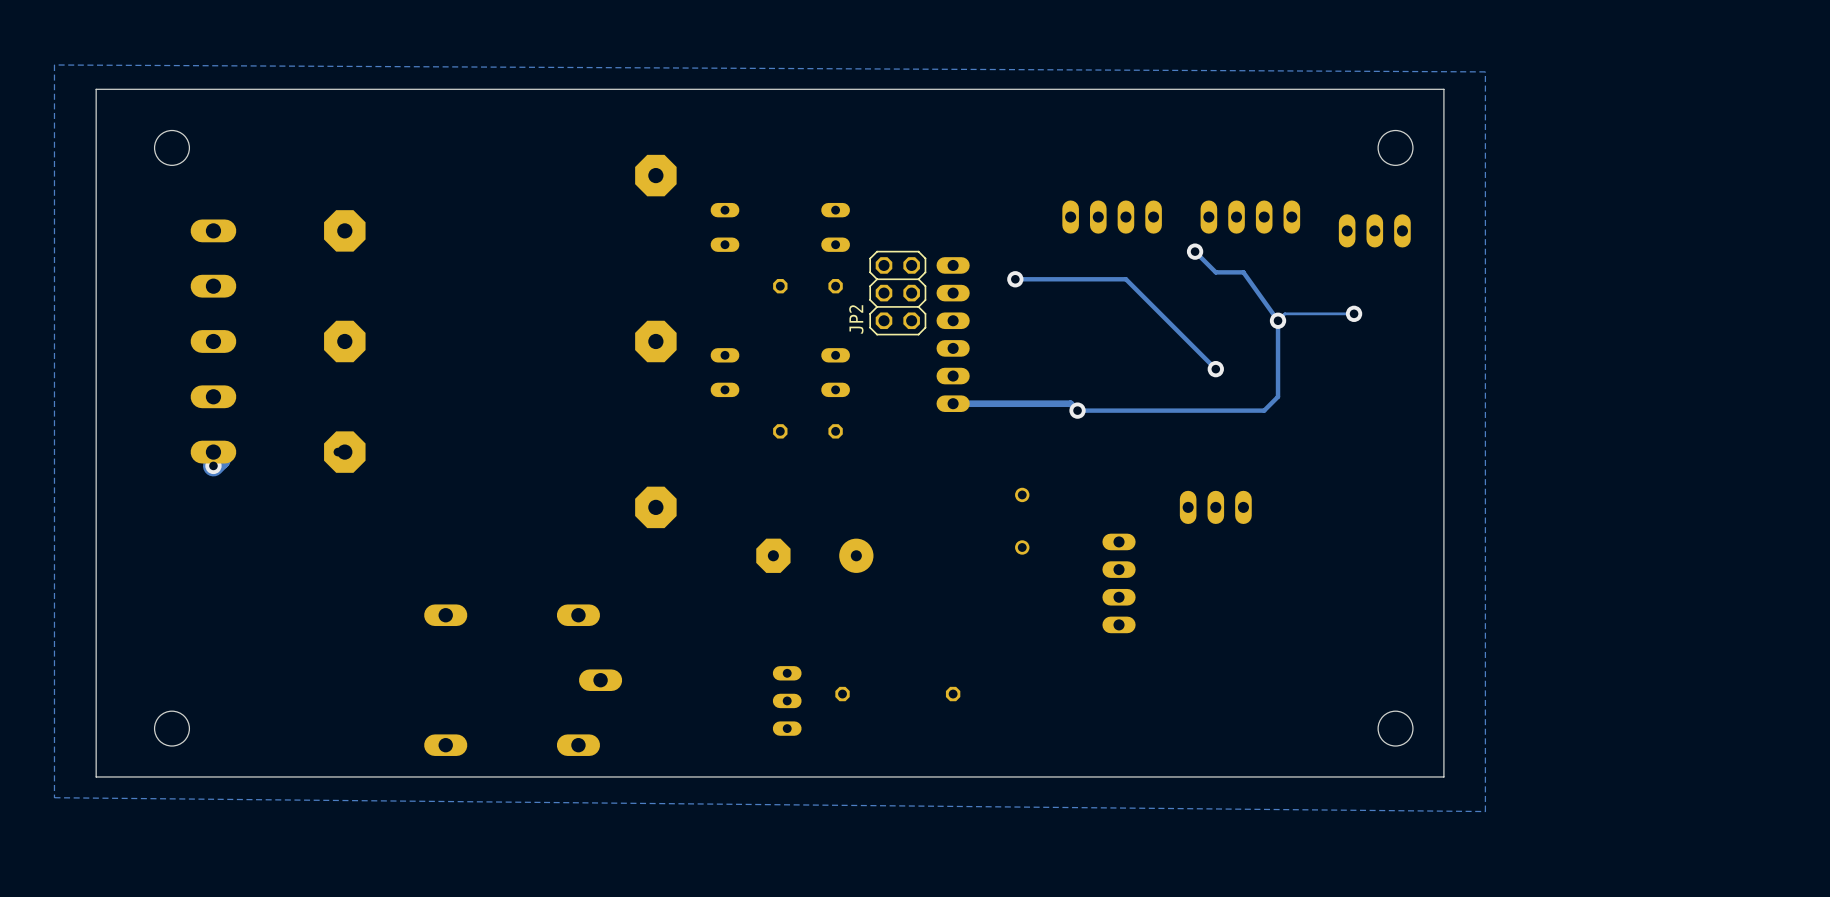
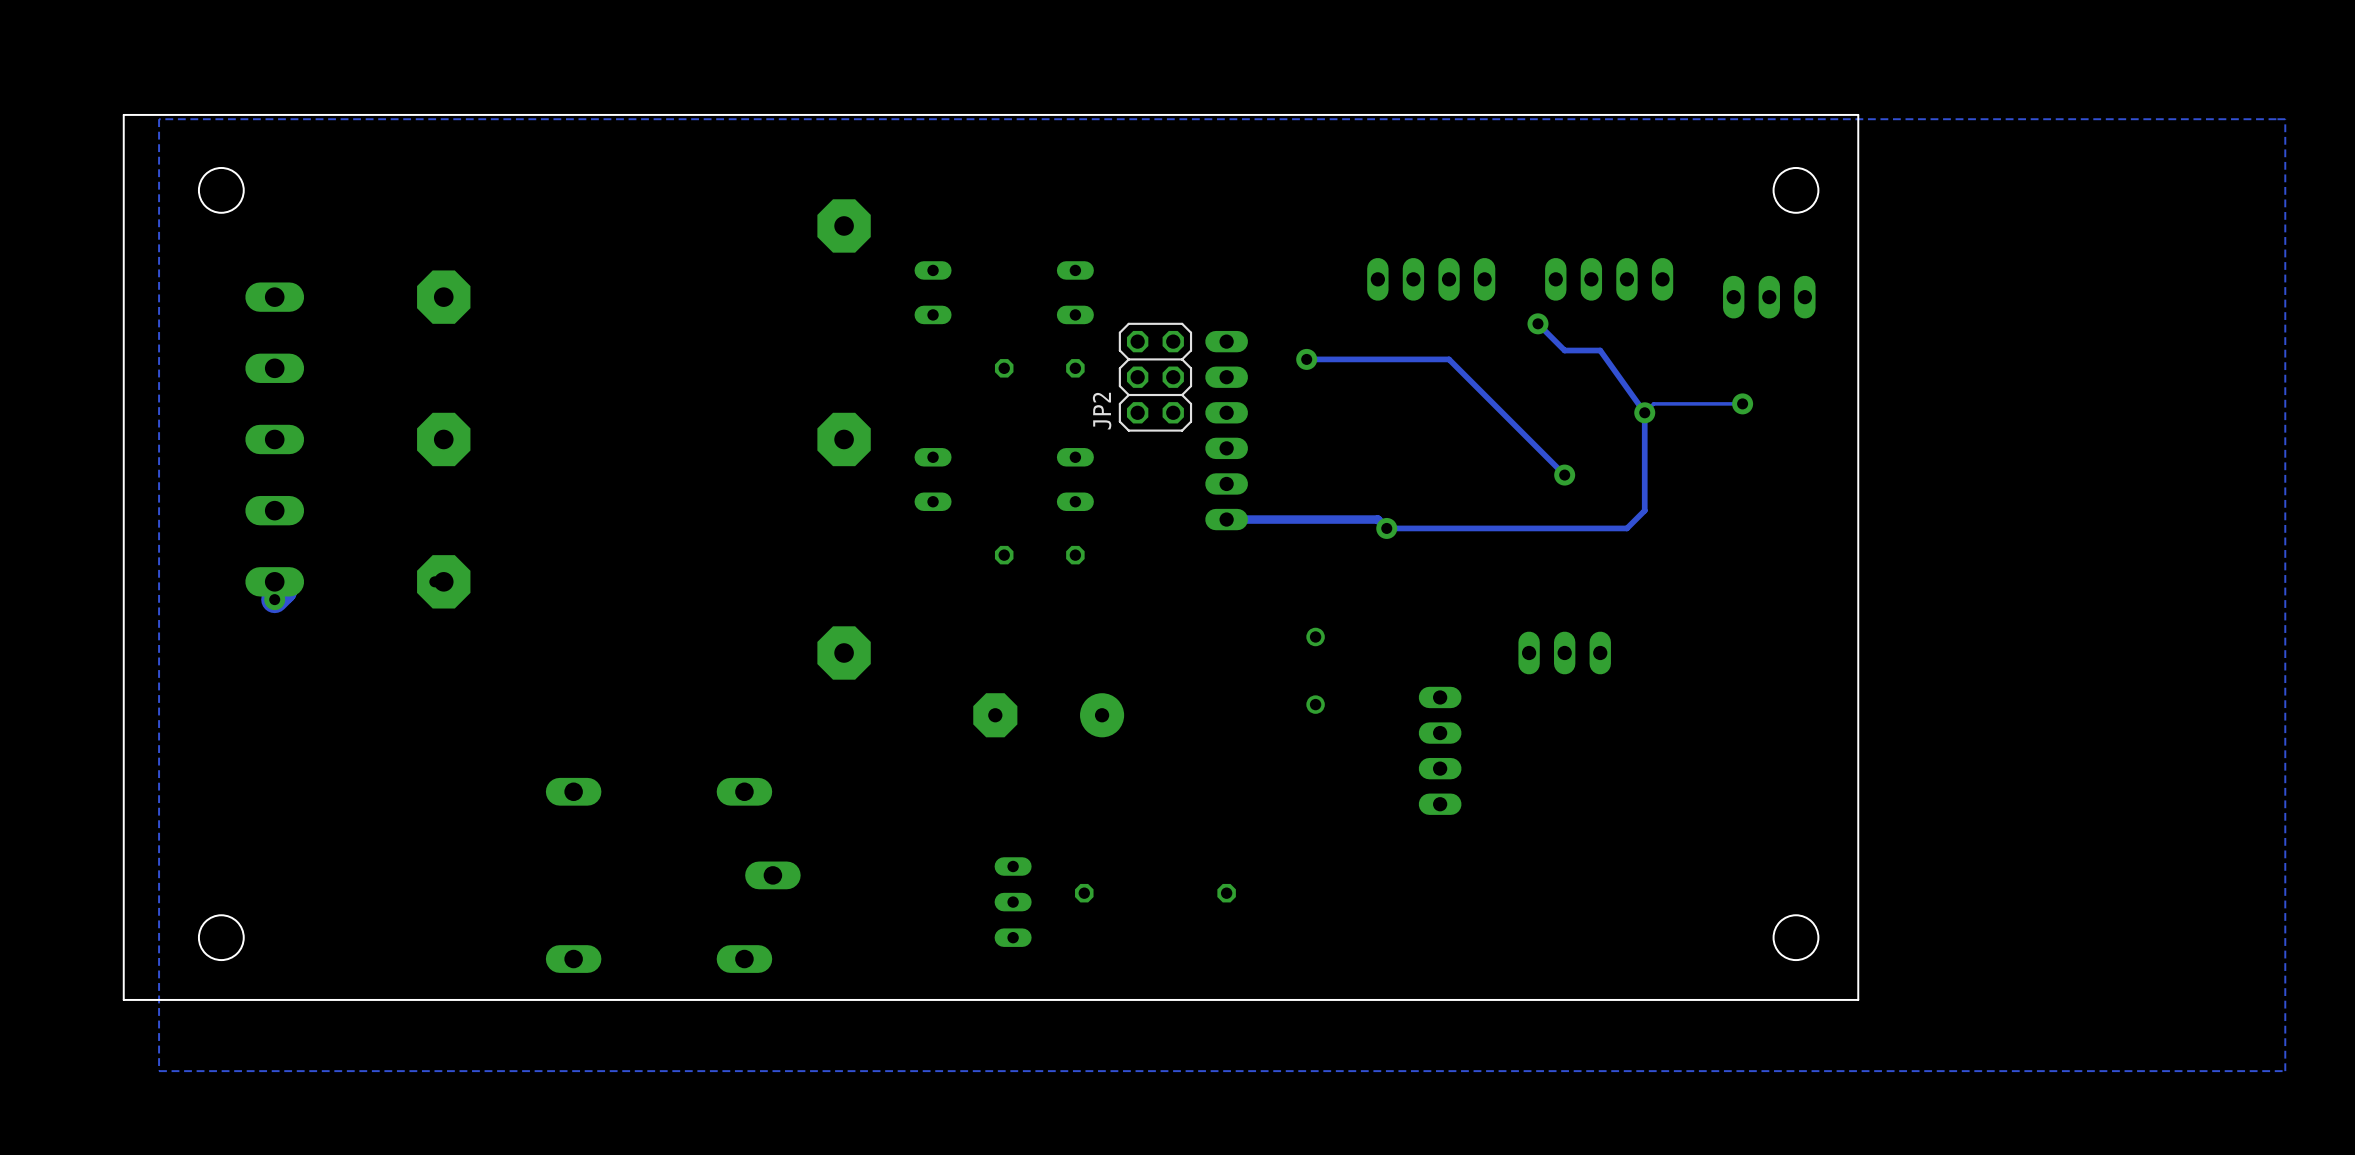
zone outline: (54, 64) (1485, 71) (1485, 811) (54, 797) (54, 64) -> (2285, 119) (2285, 1071) (159, 1071) (159, 119) (2285, 119)

